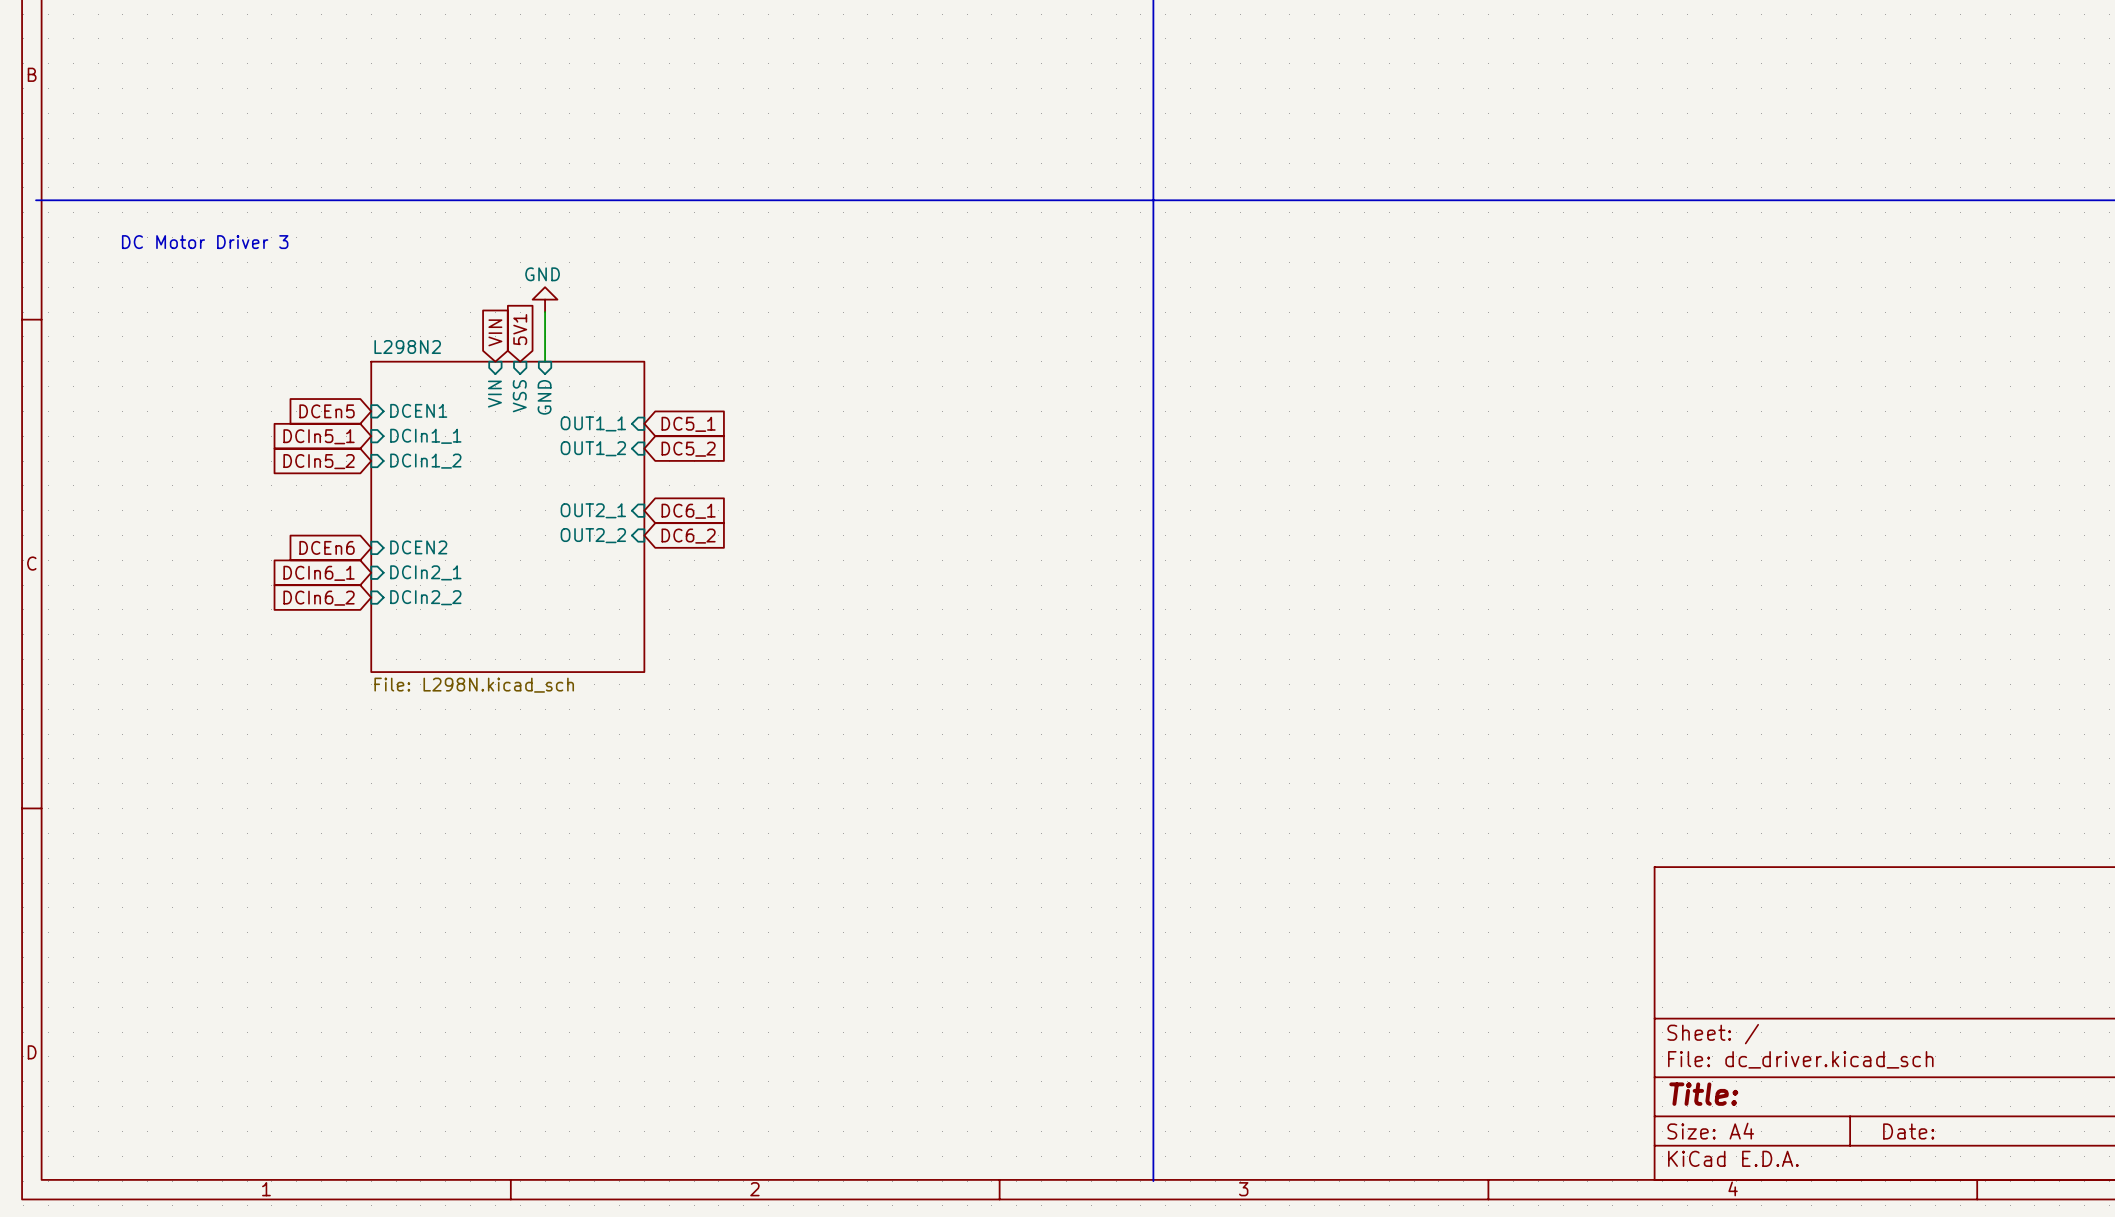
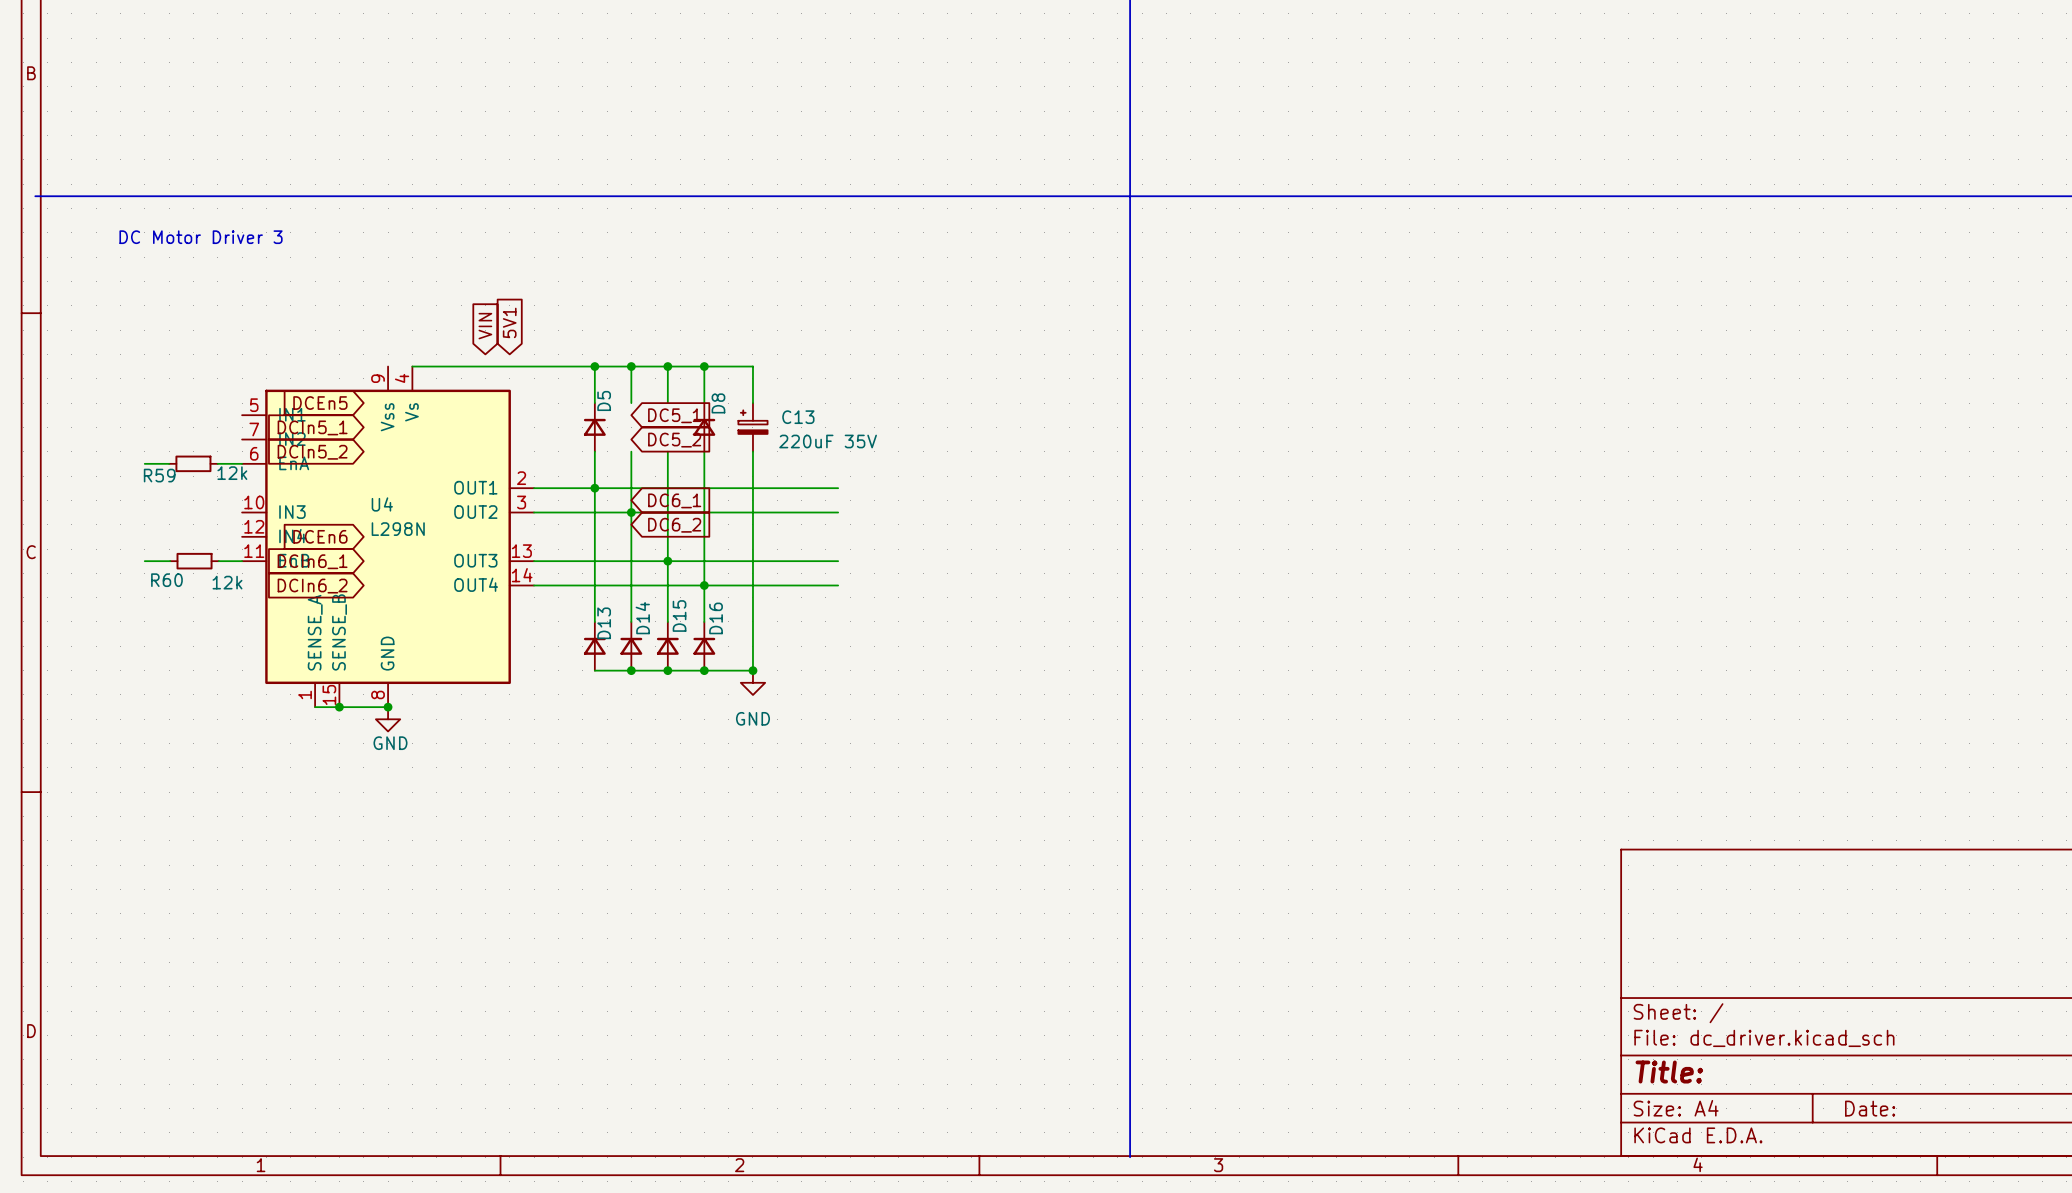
power symbol: GND (545, 299) -> none
wire: (545, 312) (545, 361) -> none
wire: none -> (412, 366) (752, 366) (752, 403)
wire: none -> (594, 366) (594, 403)
junction: none -> (594, 366)
junction: none -> (631, 366)
wire: none -> (667, 366) (667, 403)
junction: none -> (667, 366)
wire: none -> (704, 366) (704, 403)
junction: none -> (704, 366)
sheet pin: VIN (494, 394) -> none
sheet pin: VSS (519, 396) -> none
sheet pin: GND (544, 397) -> none
sheet pin: DCEN1 (418, 410) -> none
sheet pin: OUT1_1 (593, 423) -> none
sheet pin: DCIn1_1 (425, 436) -> none
D5: none -> (594, 427)
D8: none -> (704, 427)
C13: none -> 220uF 35V (752, 427)
sheet pin: OUT1_2 (593, 448) -> none
sheet pin: DCIn1_2 (425, 461) -> none
wire: none -> (594, 451) (594, 621)
wire: none -> (667, 451) (667, 621)
wire: none -> (704, 451) (704, 621)
wire: none -> (752, 451) (752, 670) (594, 670)
wire: none -> (144, 463) (169, 463)
R59: none -> 12k (193, 463)
wire: none -> (217, 463) (242, 463)
wire: none -> (534, 488) (838, 488)
junction: none -> (594, 488)
sheet pin: OUT2_1 (593, 510) -> none
sheet L298N2: File: L298N.kicad_sch (507, 516) -> none
wire: none -> (534, 512) (838, 512)
junction: none -> (631, 512)
sheet pin: OUT2_2 (593, 535) -> none
U4: none -> L298N (388, 536)
sheet pin: DCEN2 (418, 547) -> none
wire: none -> (144, 561) (170, 561)
R60: none -> 12k (194, 561)
wire: none -> (218, 561) (242, 561)
sheet pin: DCIn2_1 (425, 572) -> none
wire: none -> (534, 561) (838, 561)
junction: none -> (667, 561)
sheet pin: DCIn2_2 (425, 597) -> none
wire: none -> (534, 585) (838, 585)
junction: none -> (704, 585)
D13: none -> (594, 646)
D14: none -> (631, 646)
D15: none -> (667, 646)
D16: none -> (704, 646)
junction: none -> (631, 670)
junction: none -> (667, 670)
junction: none -> (704, 670)
junction: none -> (752, 670)
power symbol: none -> GND (752, 682)
wire: none -> (315, 707) (388, 707)
junction: none -> (339, 707)
junction: none -> (388, 707)
power symbol: none -> GND (388, 719)

